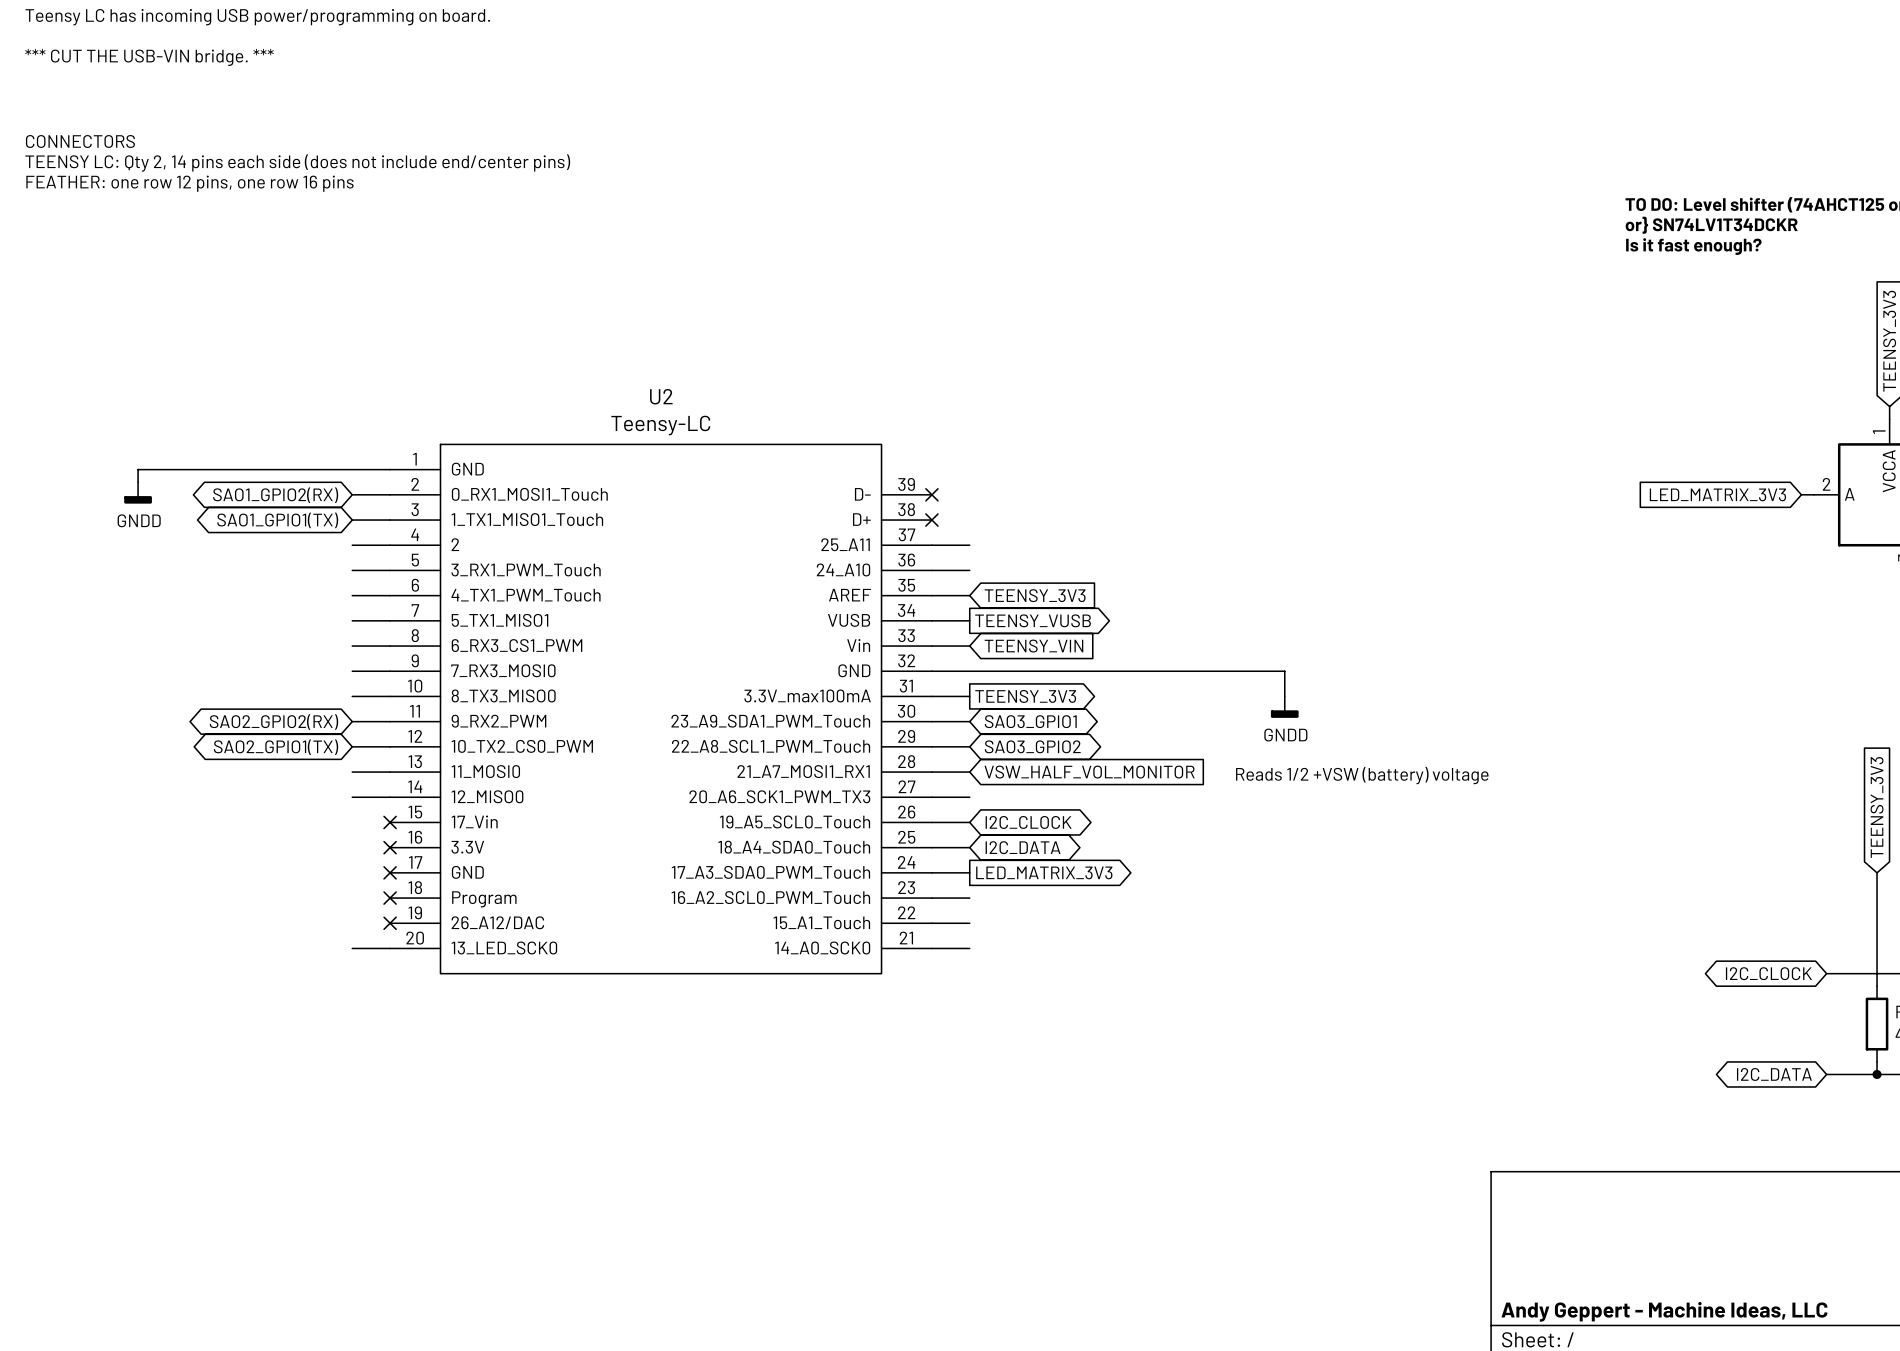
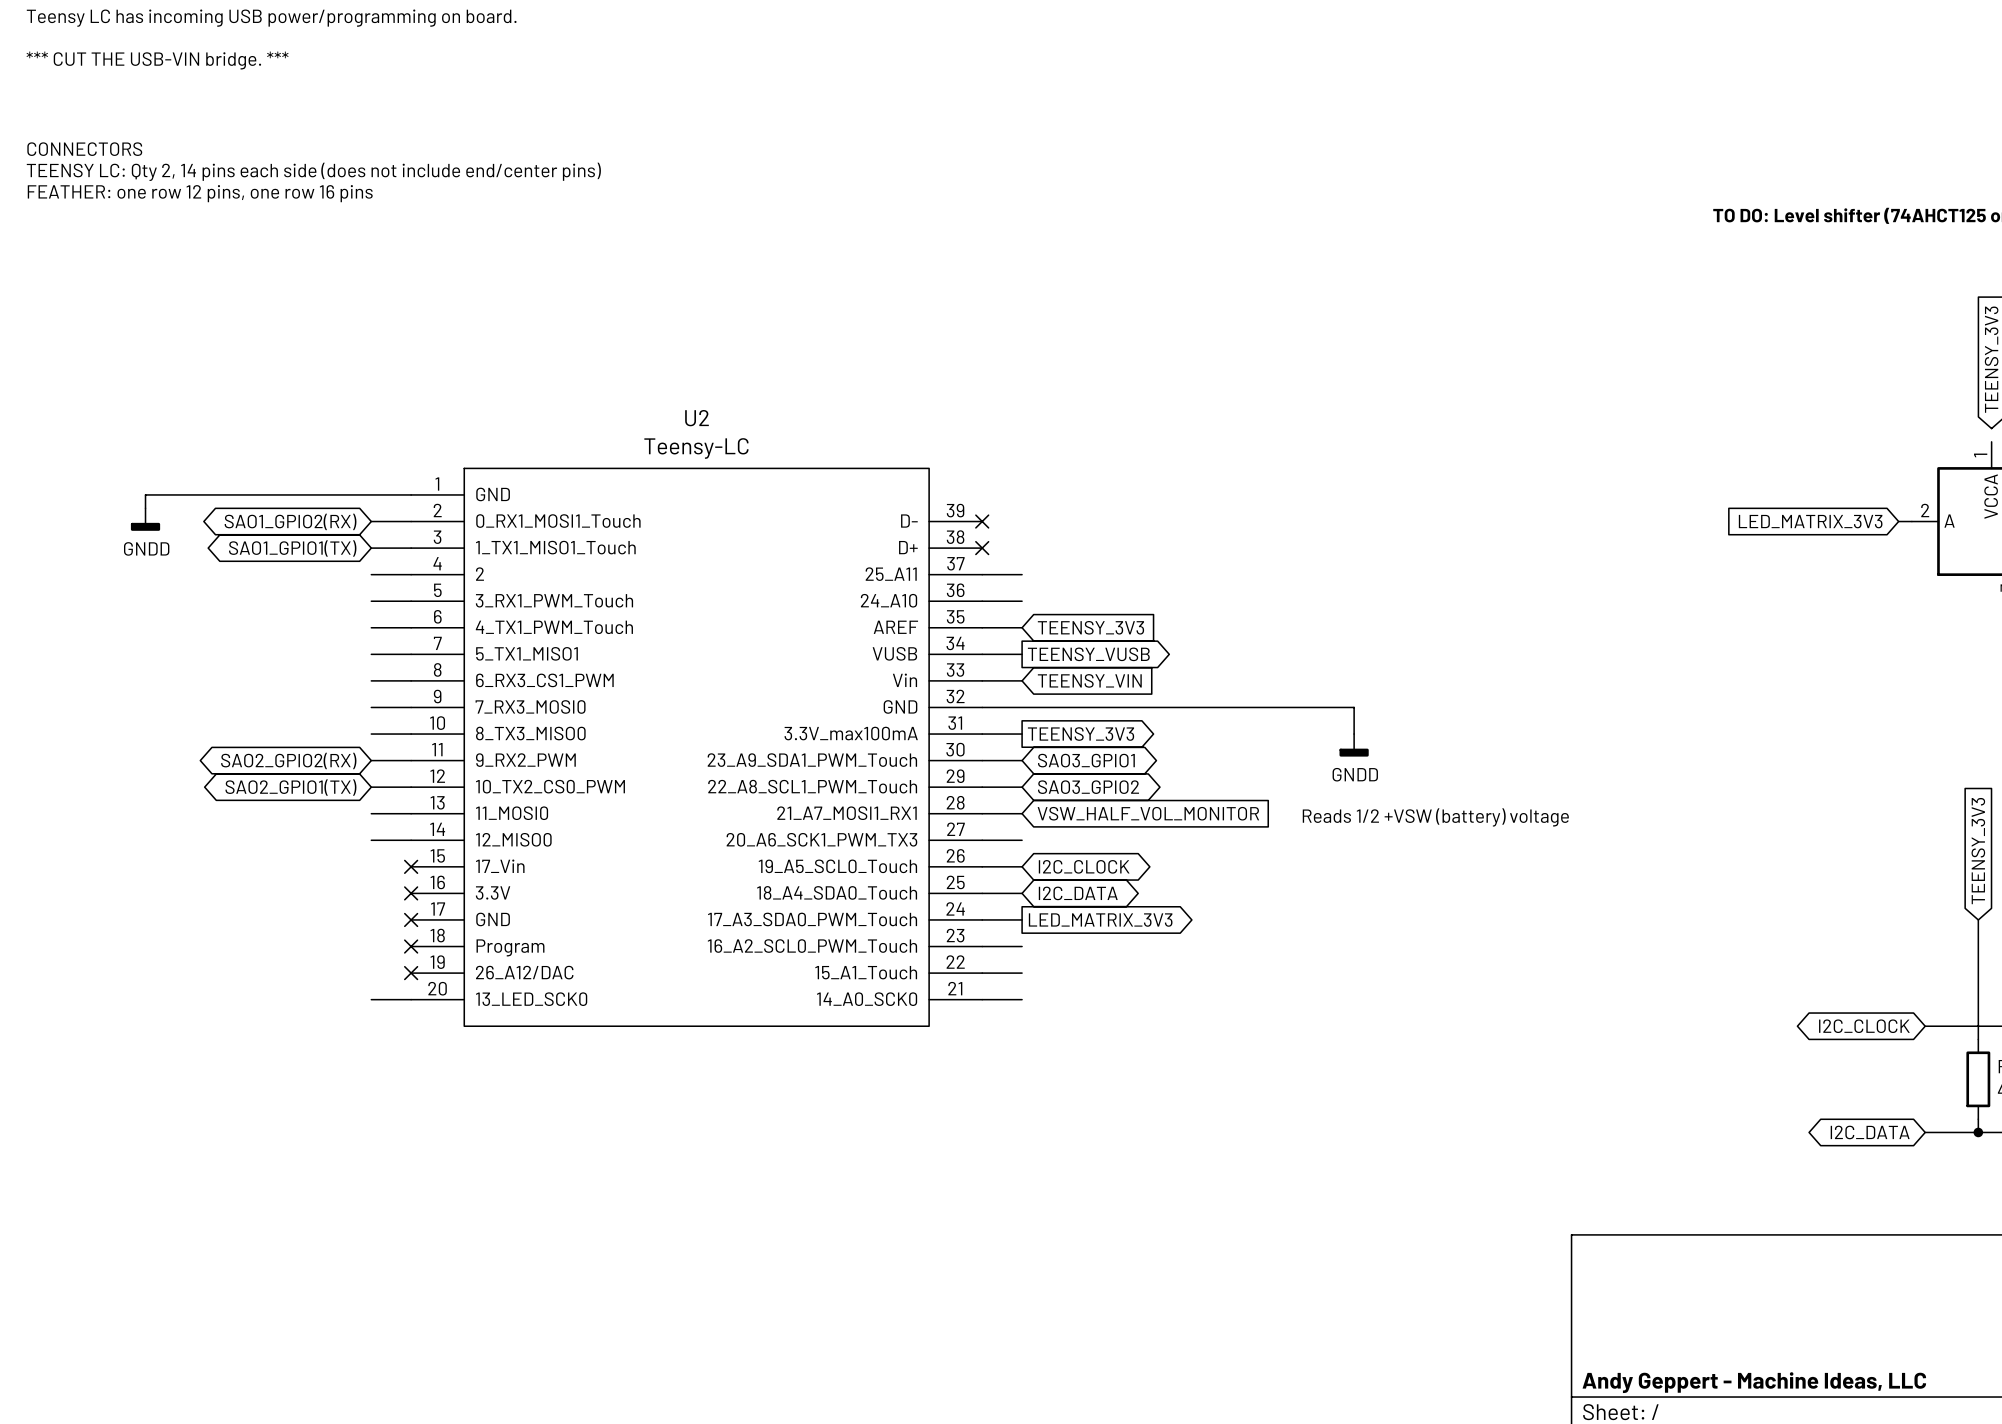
text: or} SN74LV1T34DCKR (1711, 225) -> none
text: Is it fast enough? (1693, 246) -> none
wire: (1889, 406) (1889, 419) -> none

